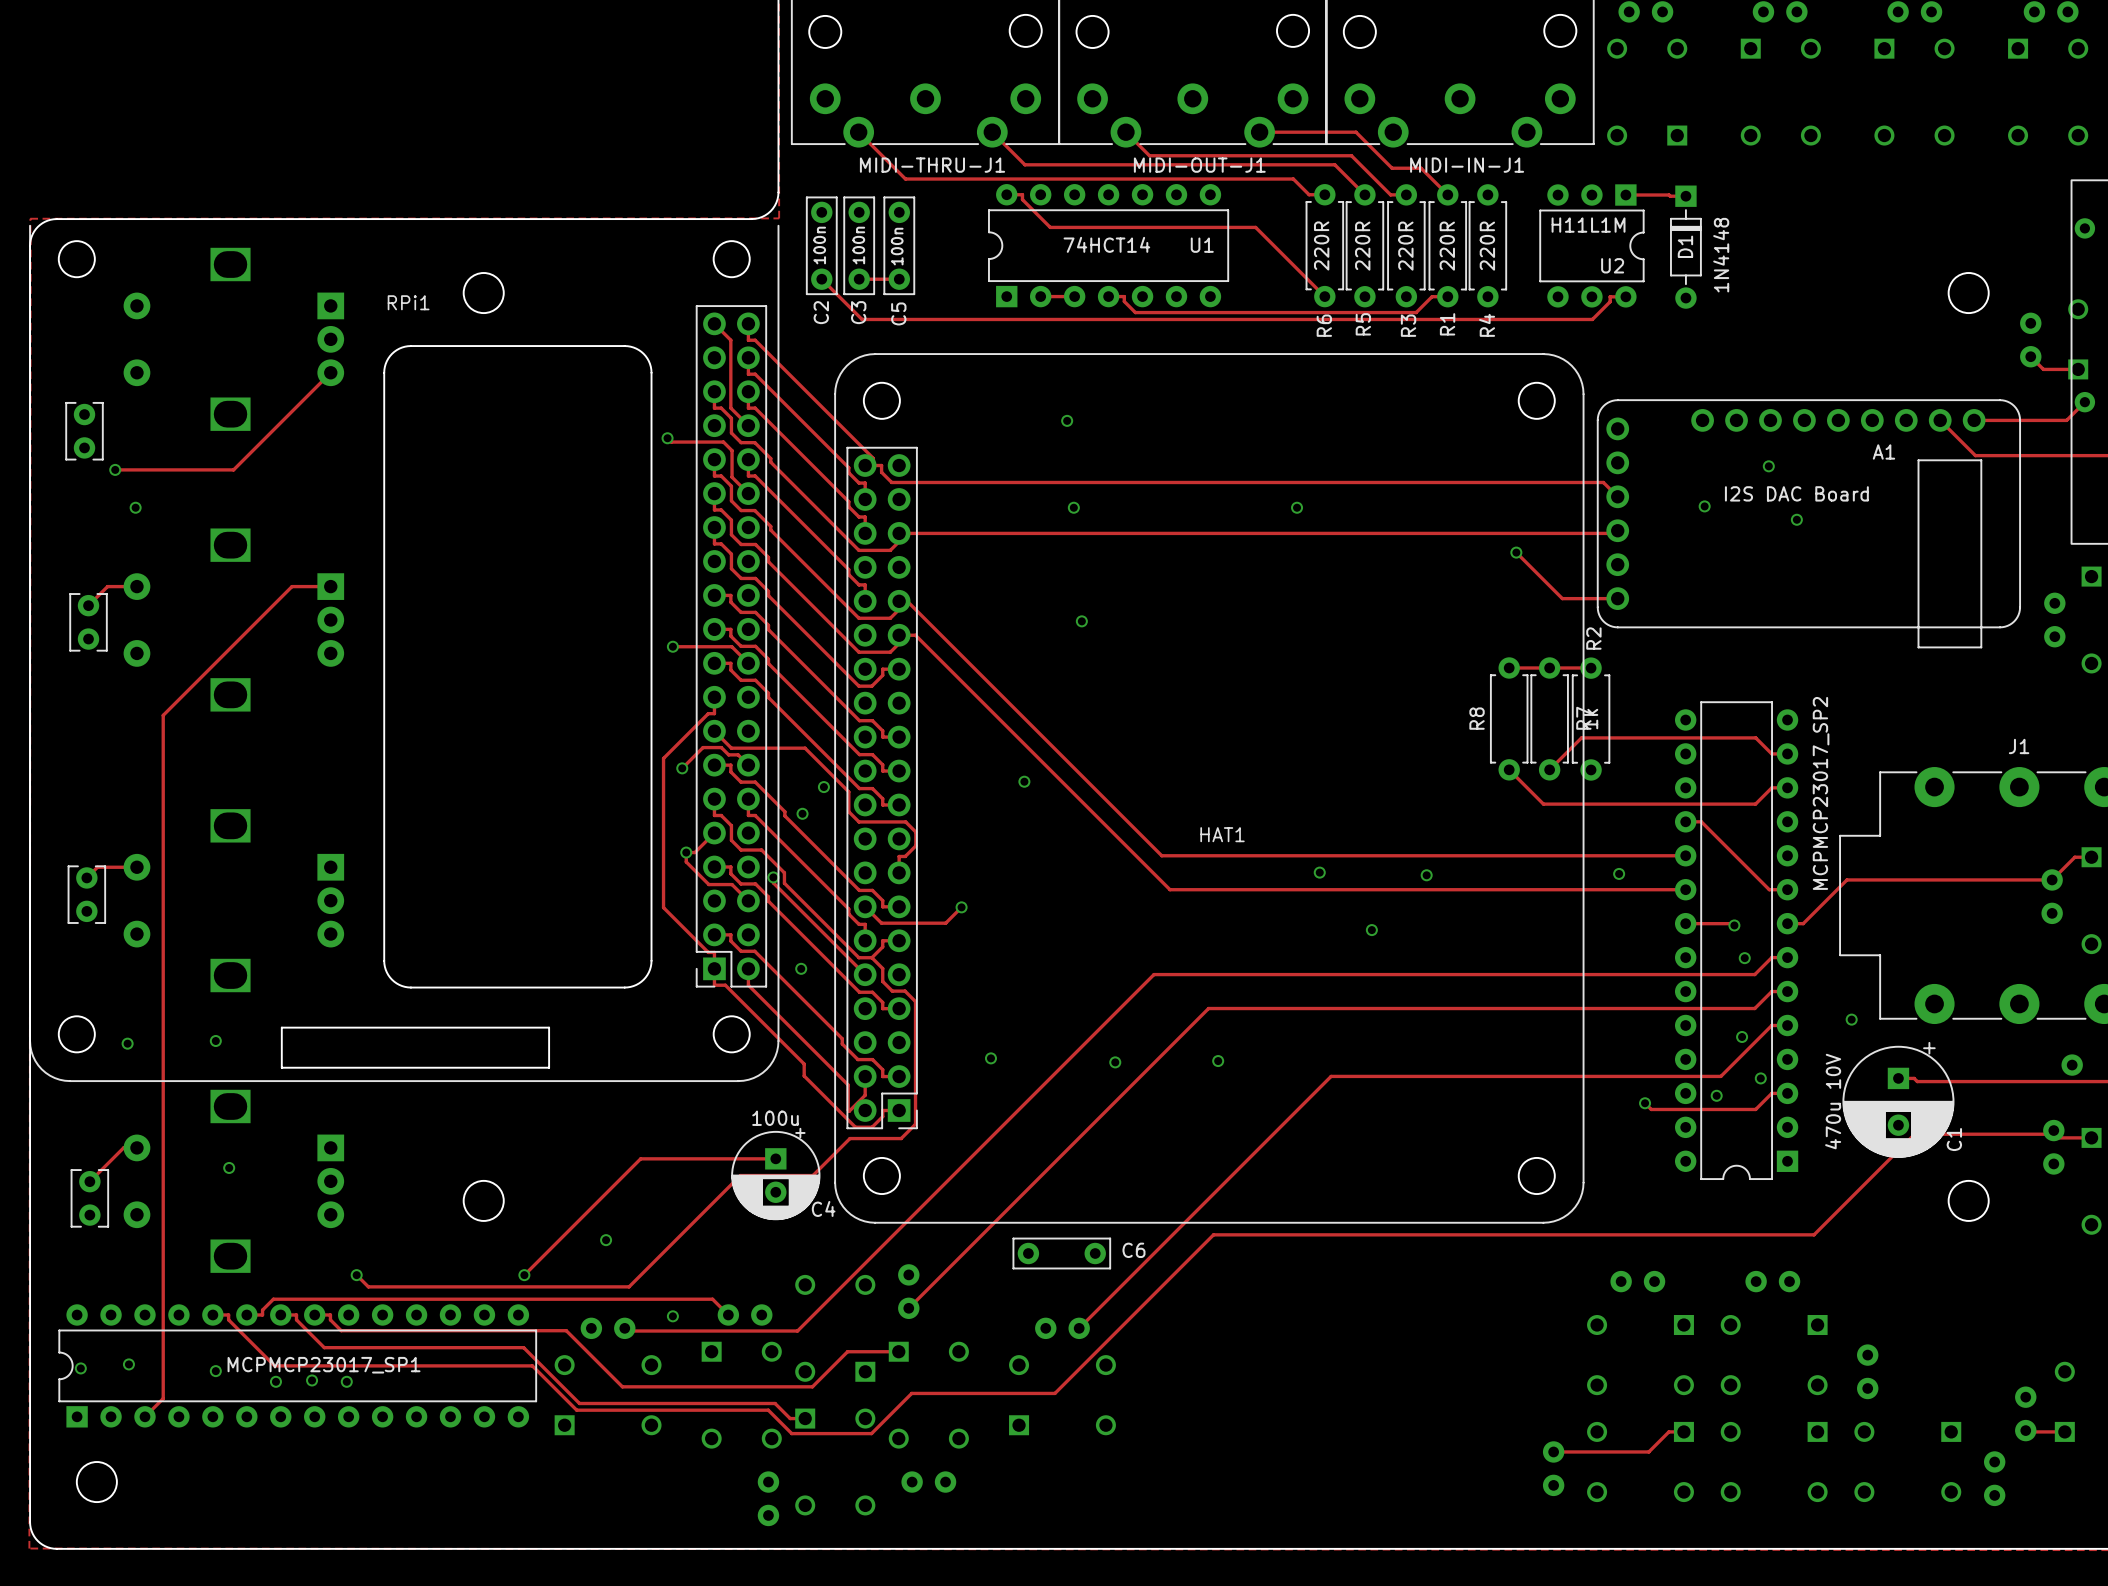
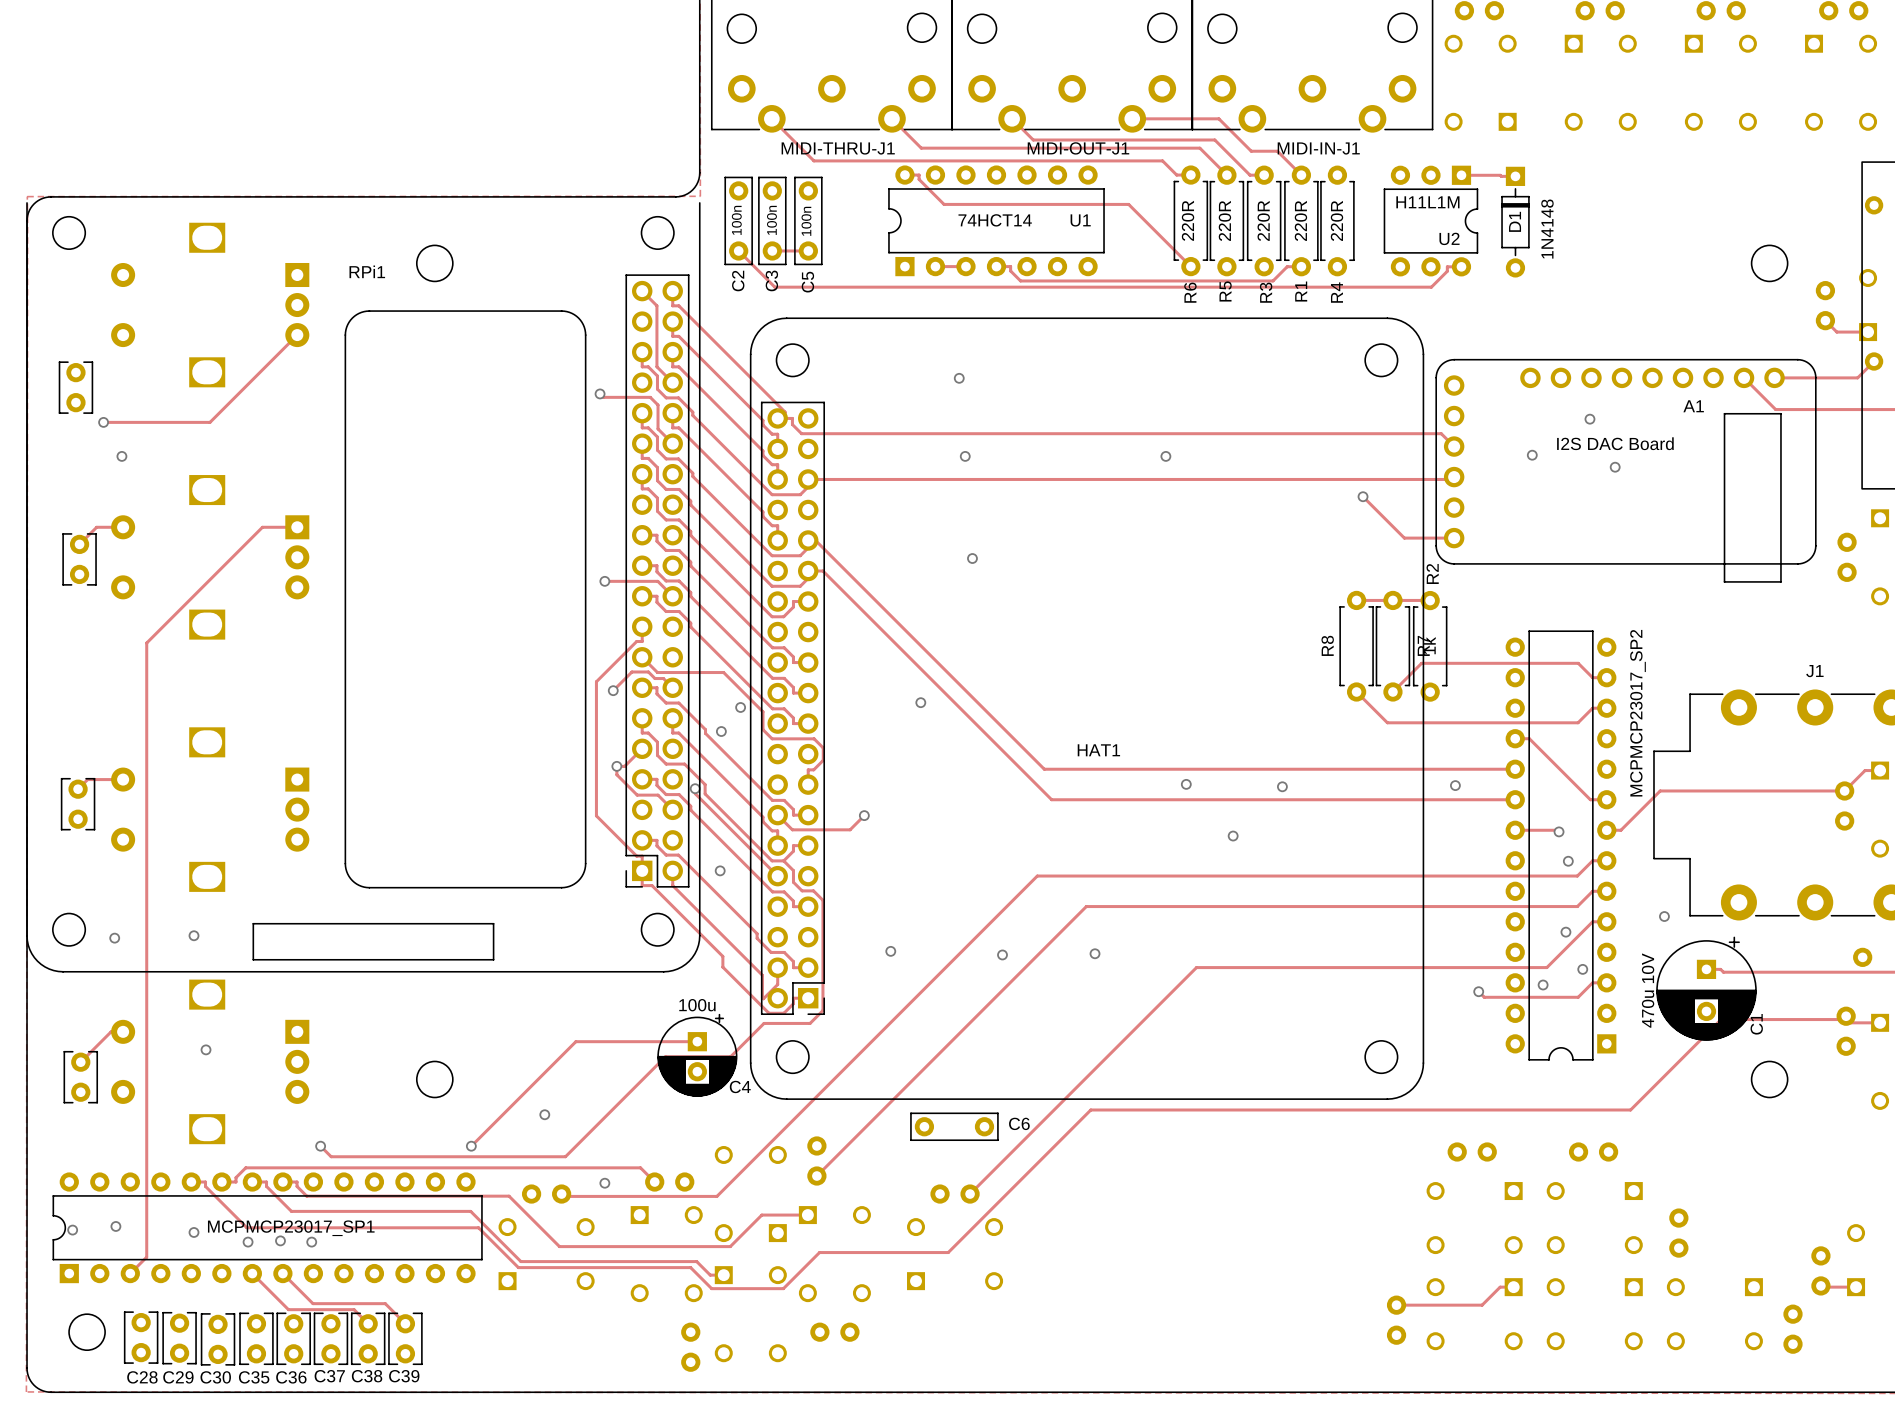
track: none -> (252, 1273) (288, 1309) (354, 1309) (368, 1323)
track: none -> (282, 1273) (312, 1303) (385, 1303) (405, 1323)
C28: none -> (141, 1337)
C29: none -> (179, 1338)
C35: none -> (256, 1338)
C36: none -> (293, 1338)
C37: none -> (330, 1338)
C38: none -> (368, 1338)
C39: none -> (405, 1338)
C30: none -> (218, 1339)

